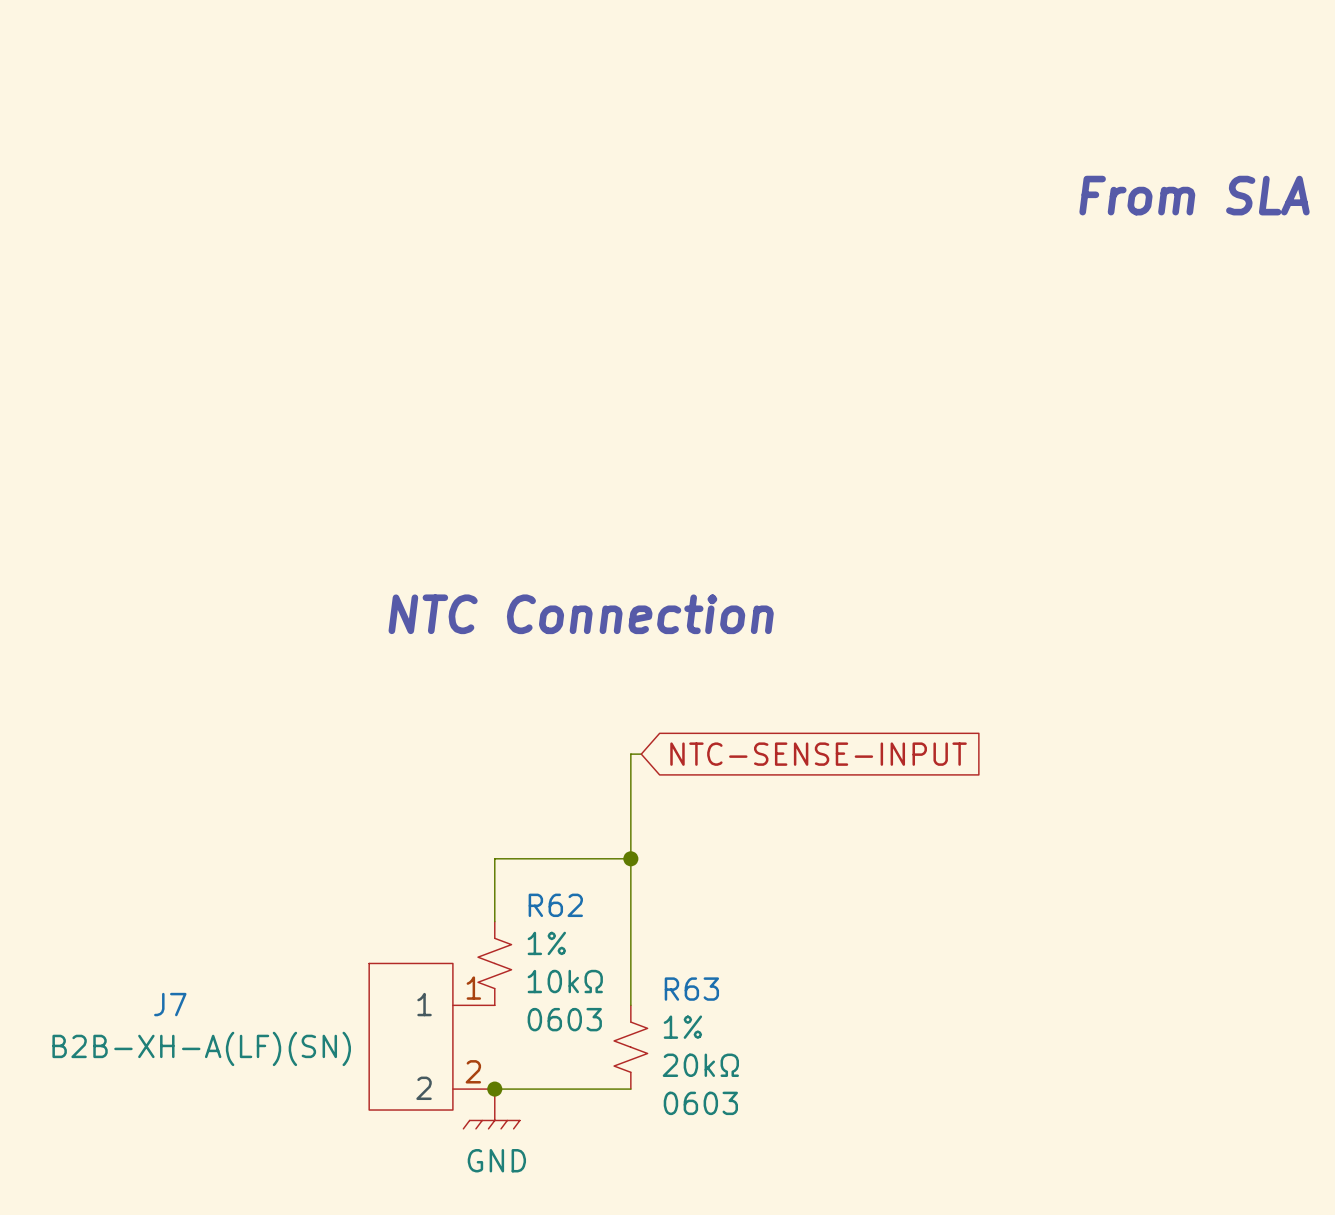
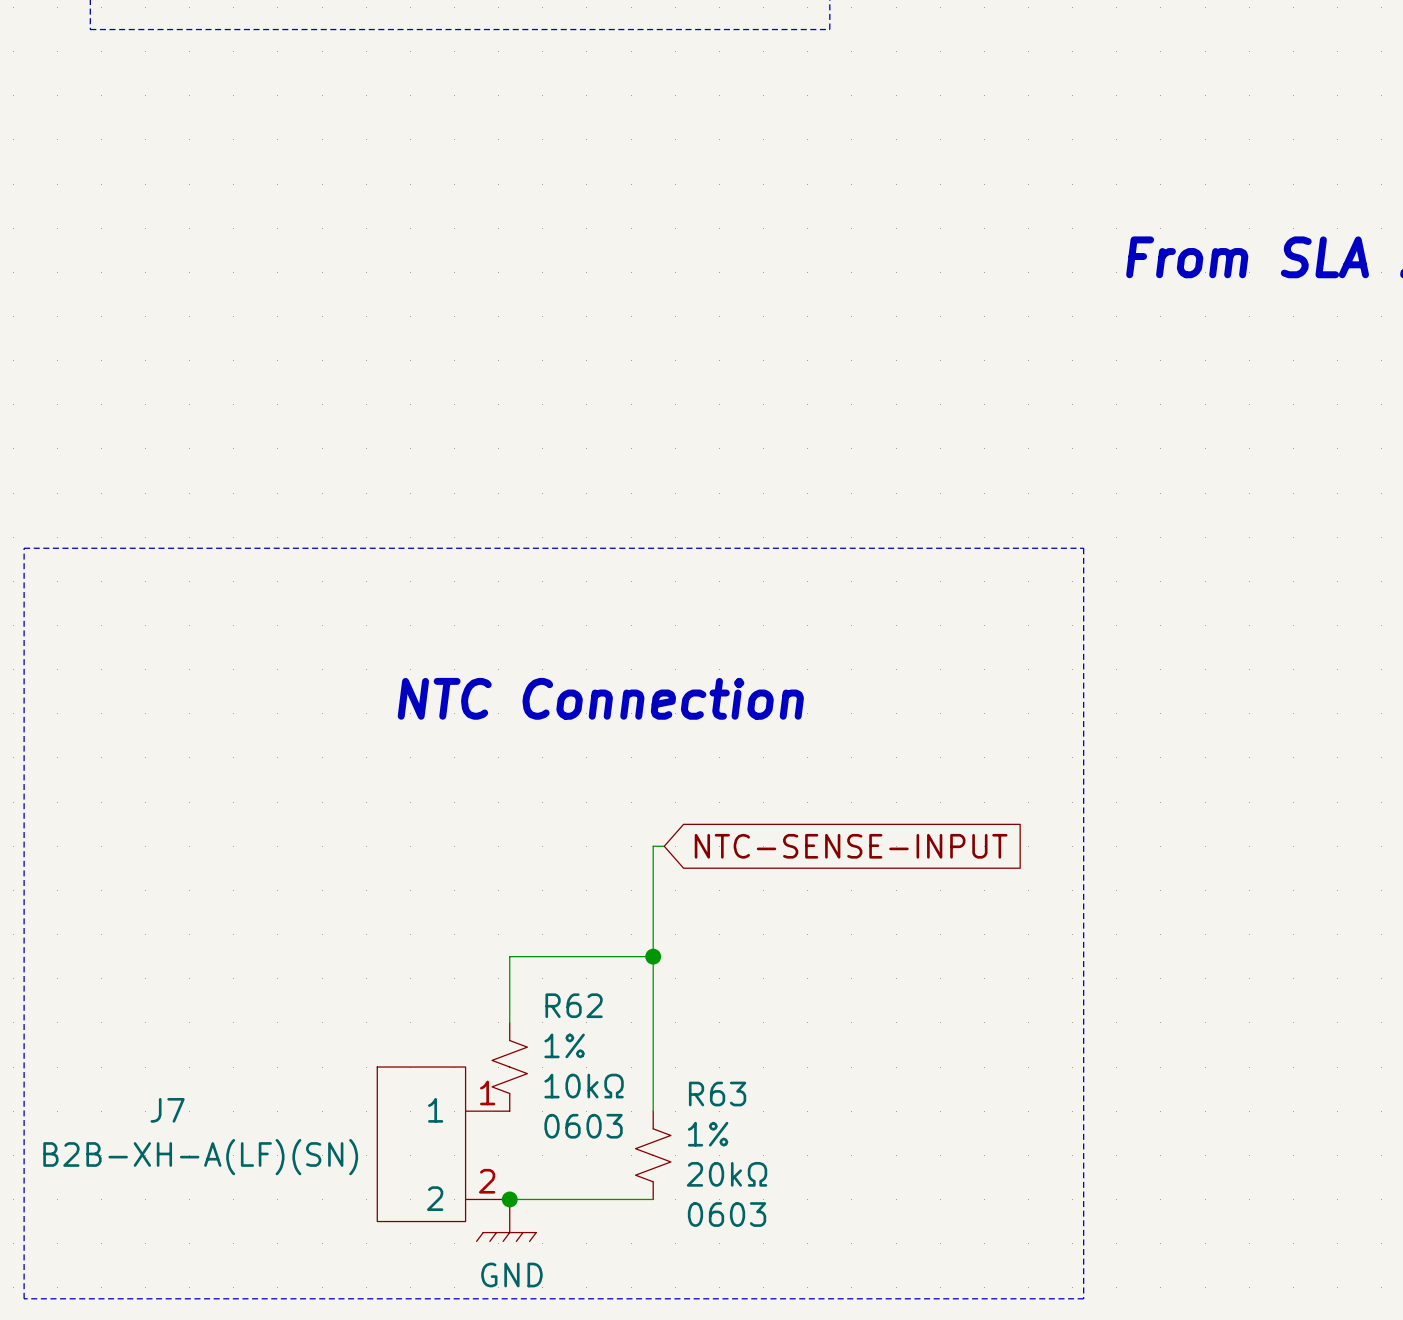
line: none -> (24, 548) (24, 1298) (1083, 1298) (1083, 548) (24, 548)

